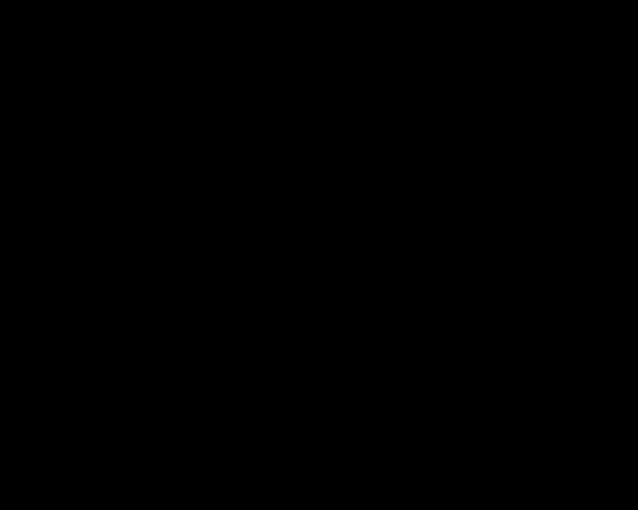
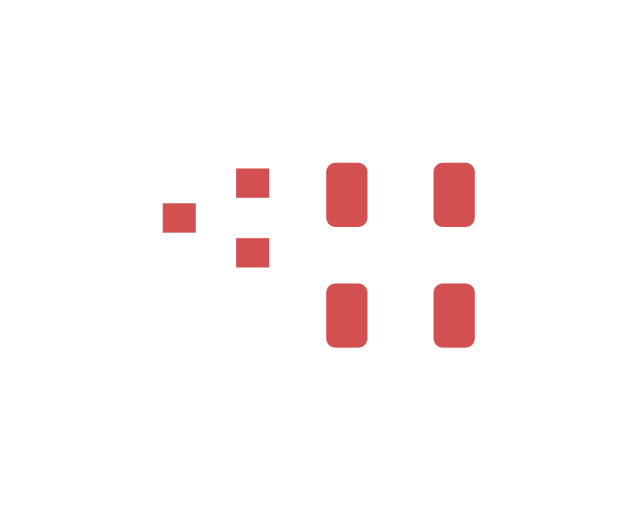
part: none -> (400, 194)
part: none -> (215, 217)
part: none -> (400, 315)

